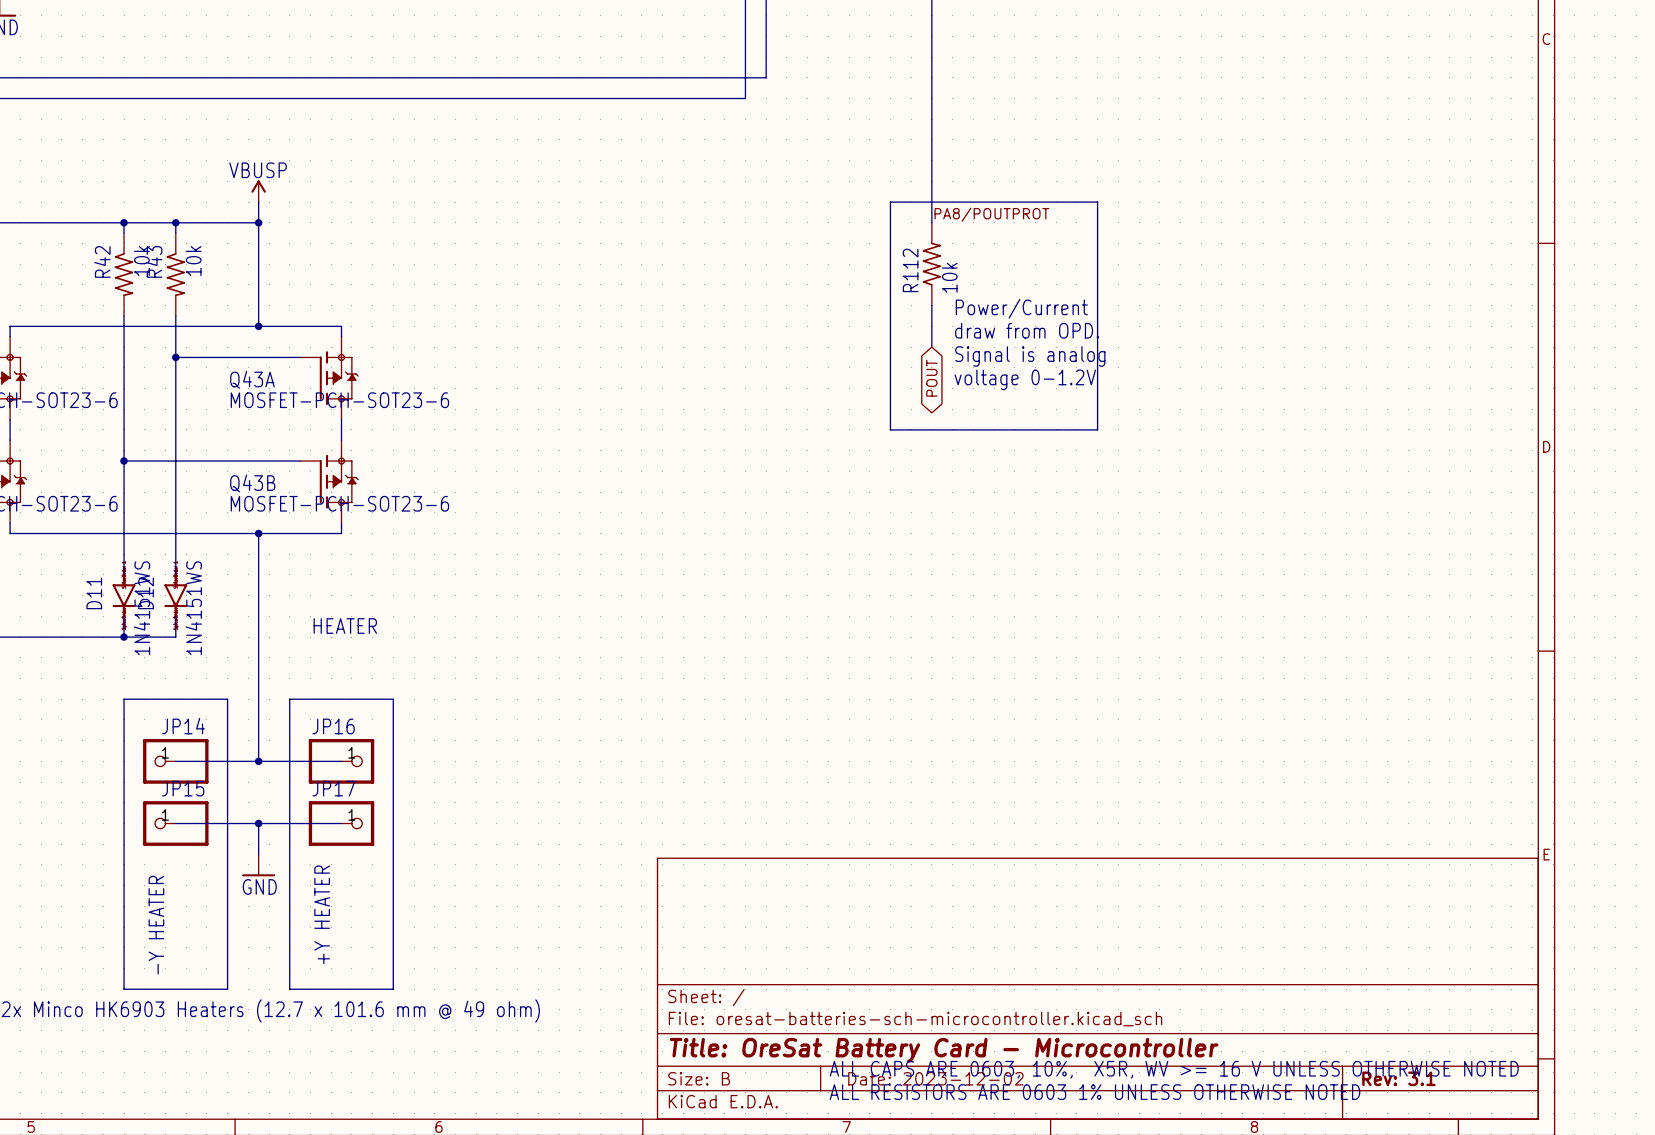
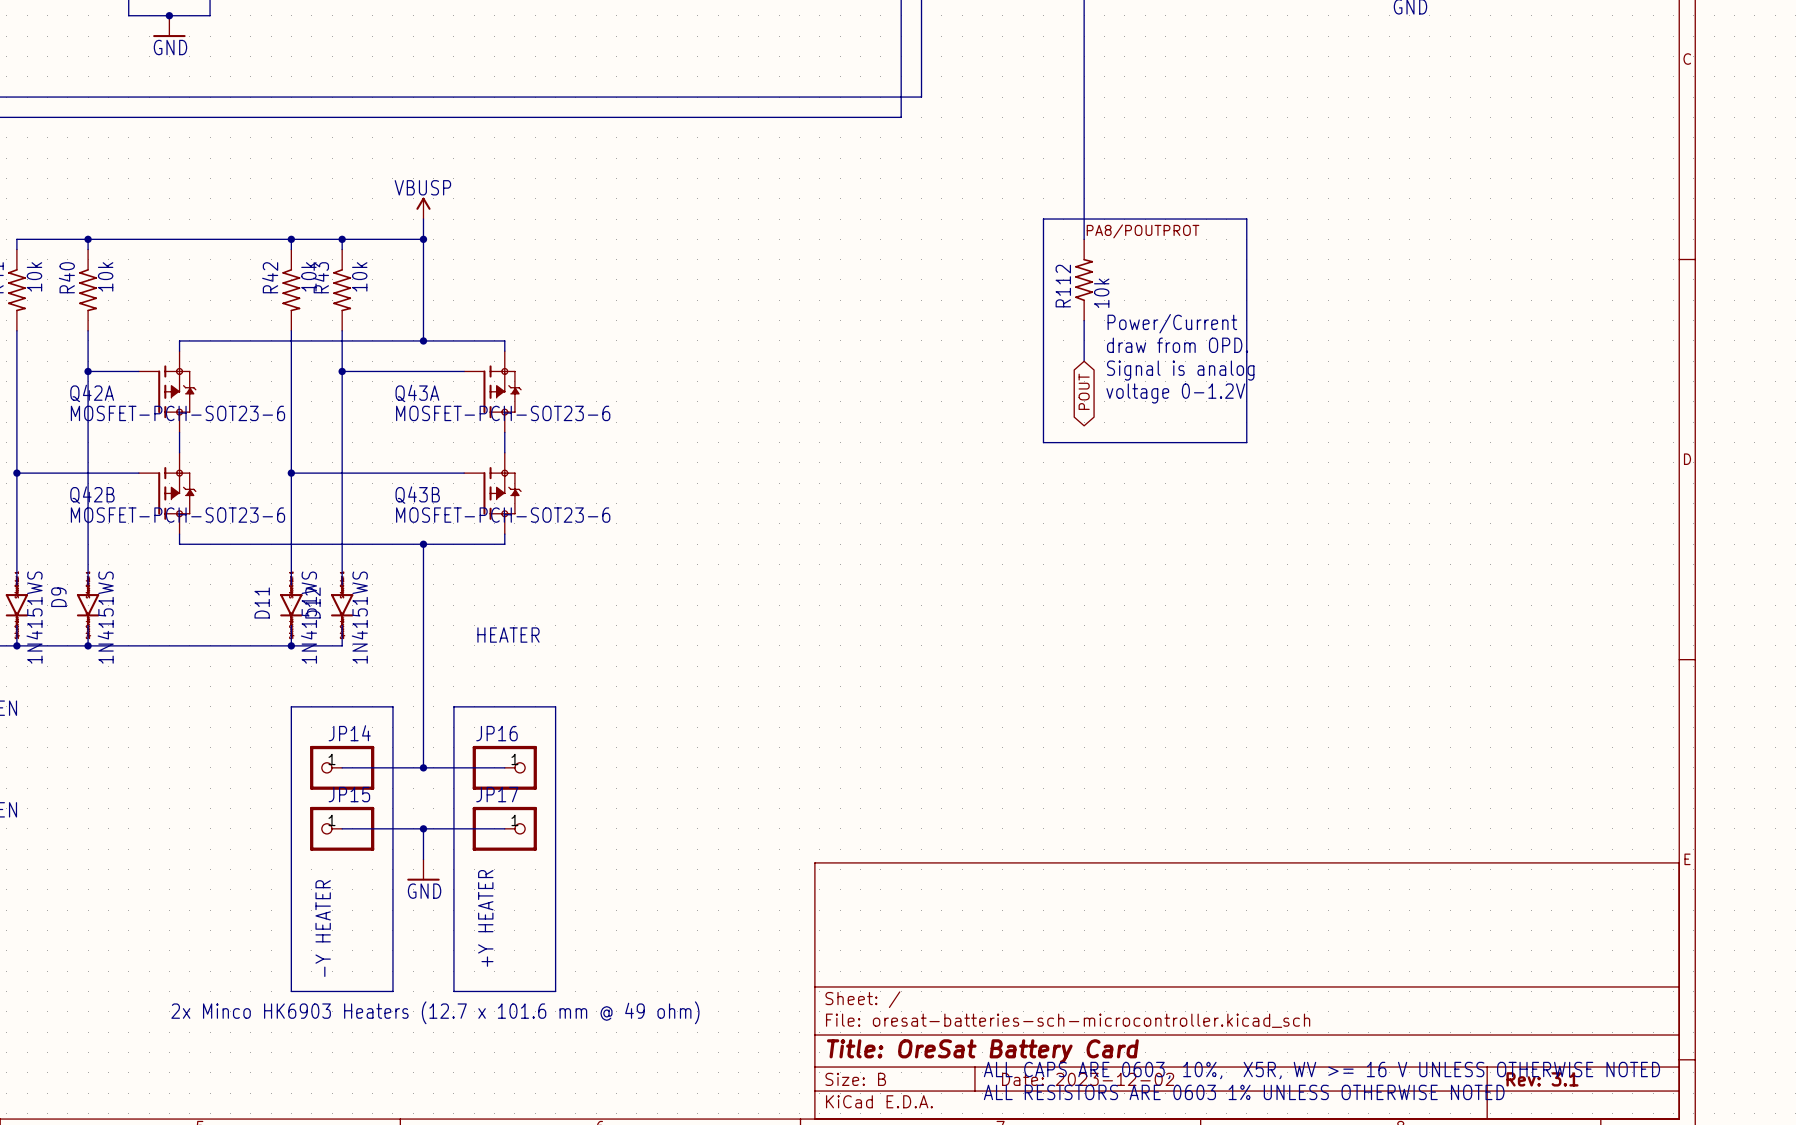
title block: Title: OreSat Battery Card - Microcontroller (944, 1050) -> Title: OreSat Battery Card (982, 1051)

